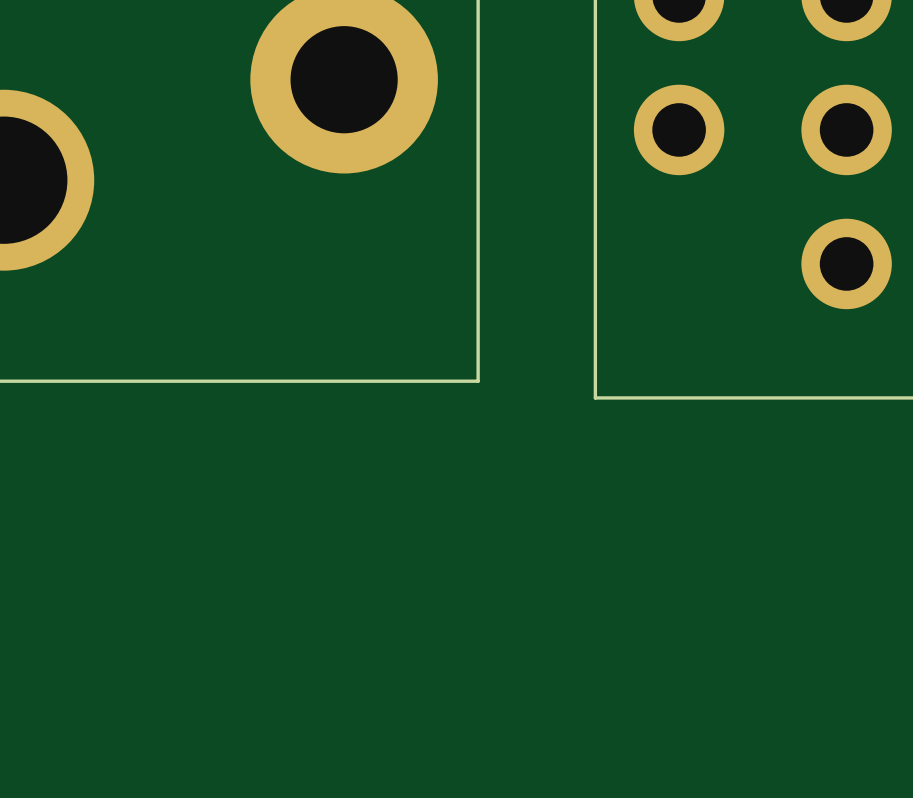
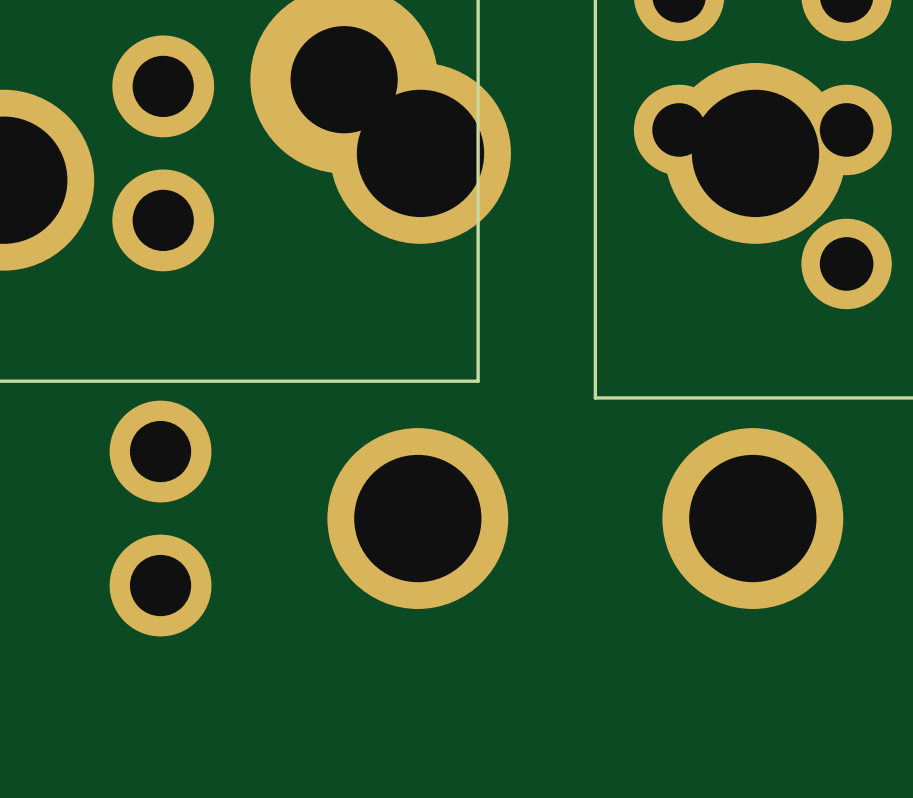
part: none -> (479, 153)
part: none -> (476, 518)

